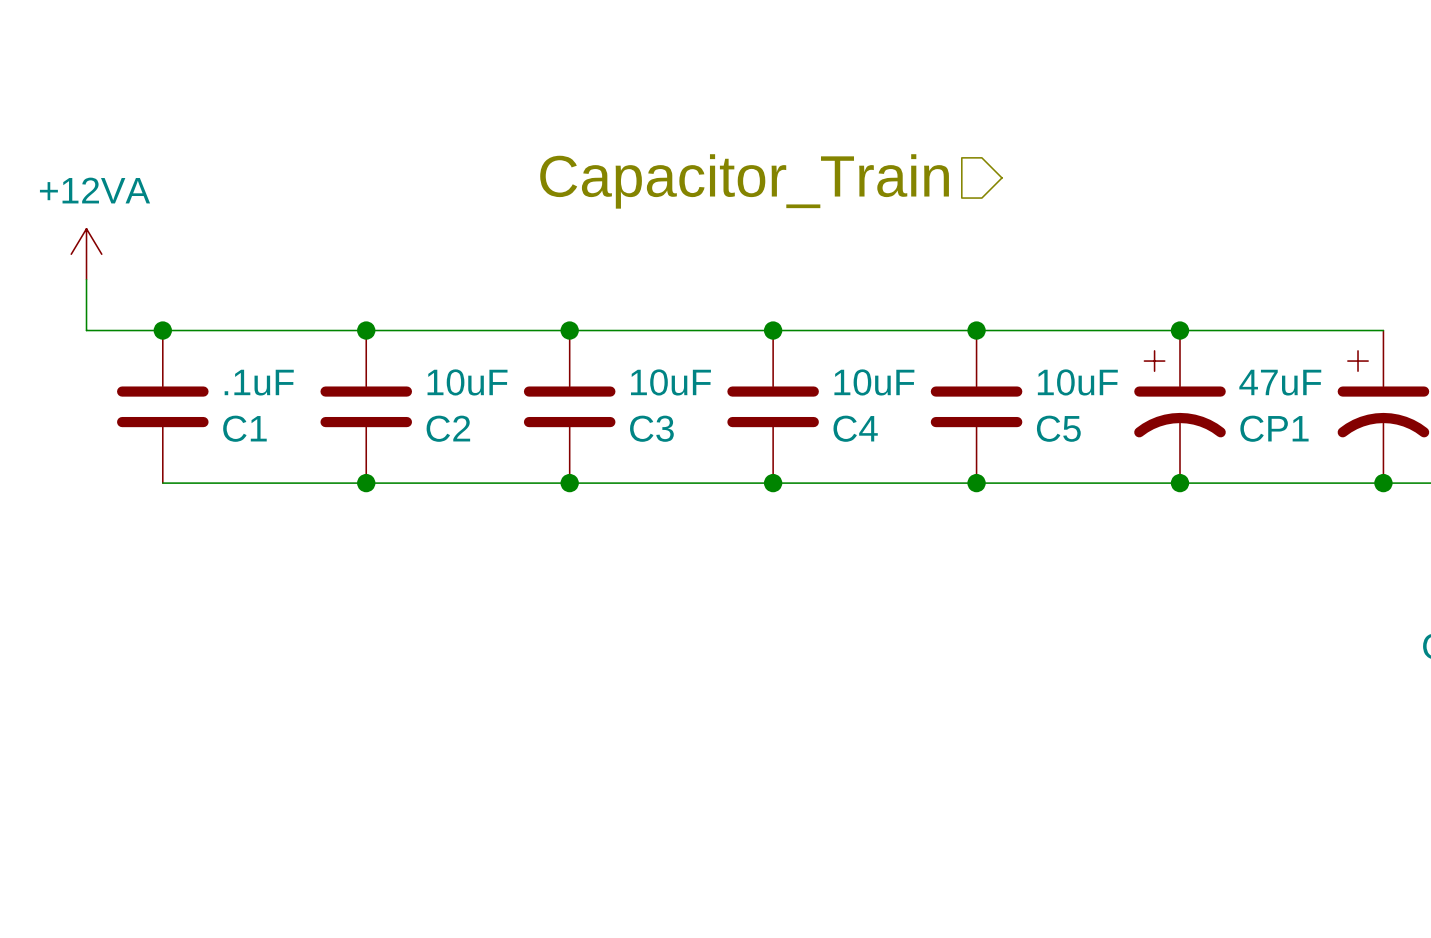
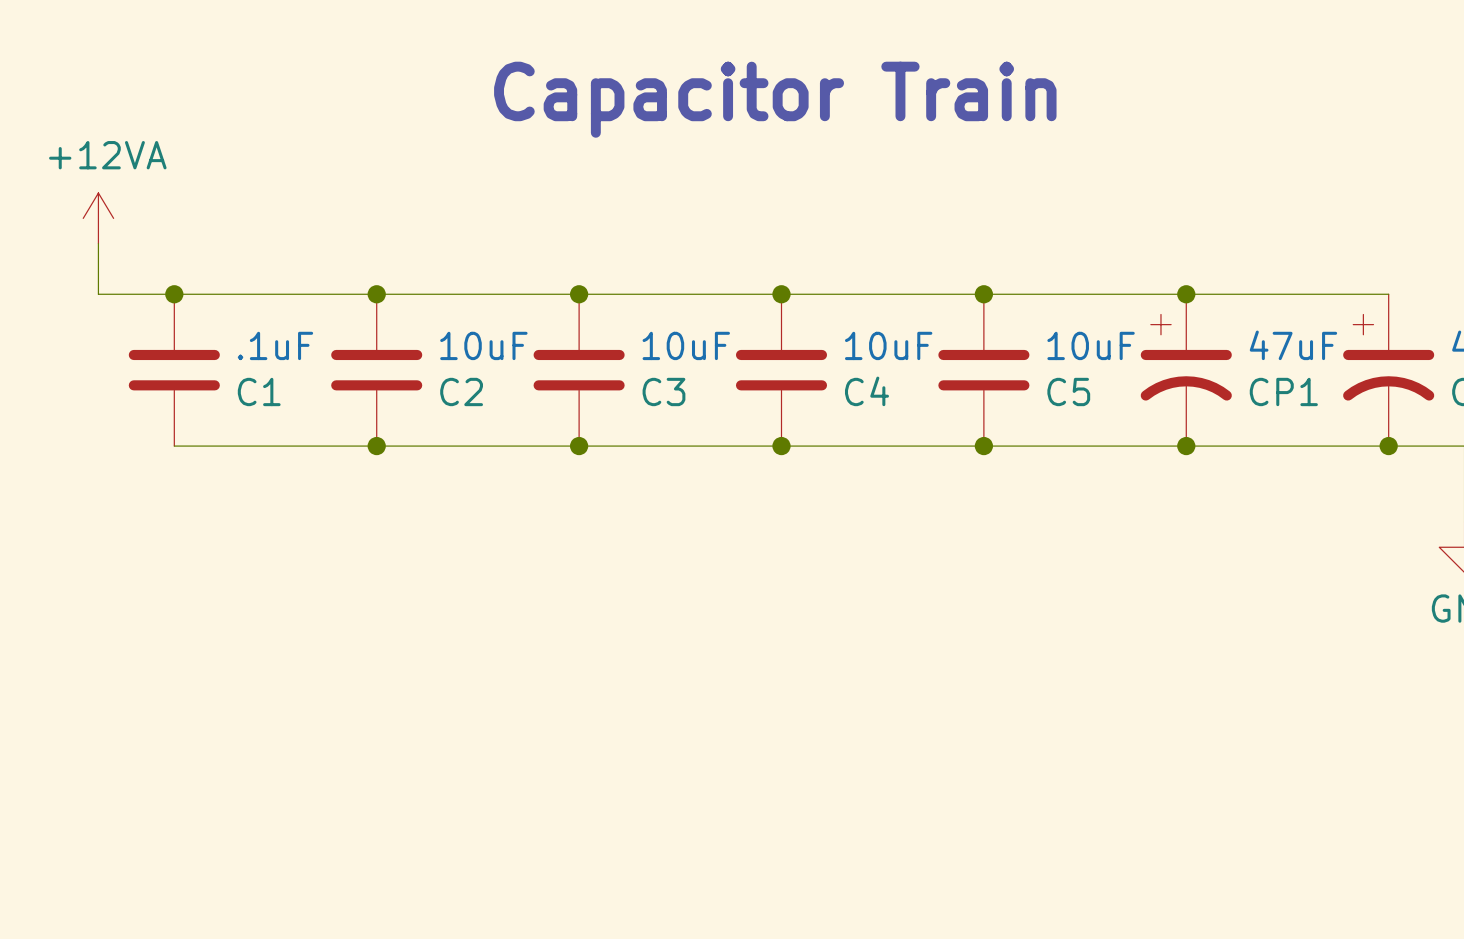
text: none -> Capacitor Train (775, 99)
hierarchical label: Capacitor_Train (744, 181) -> none

